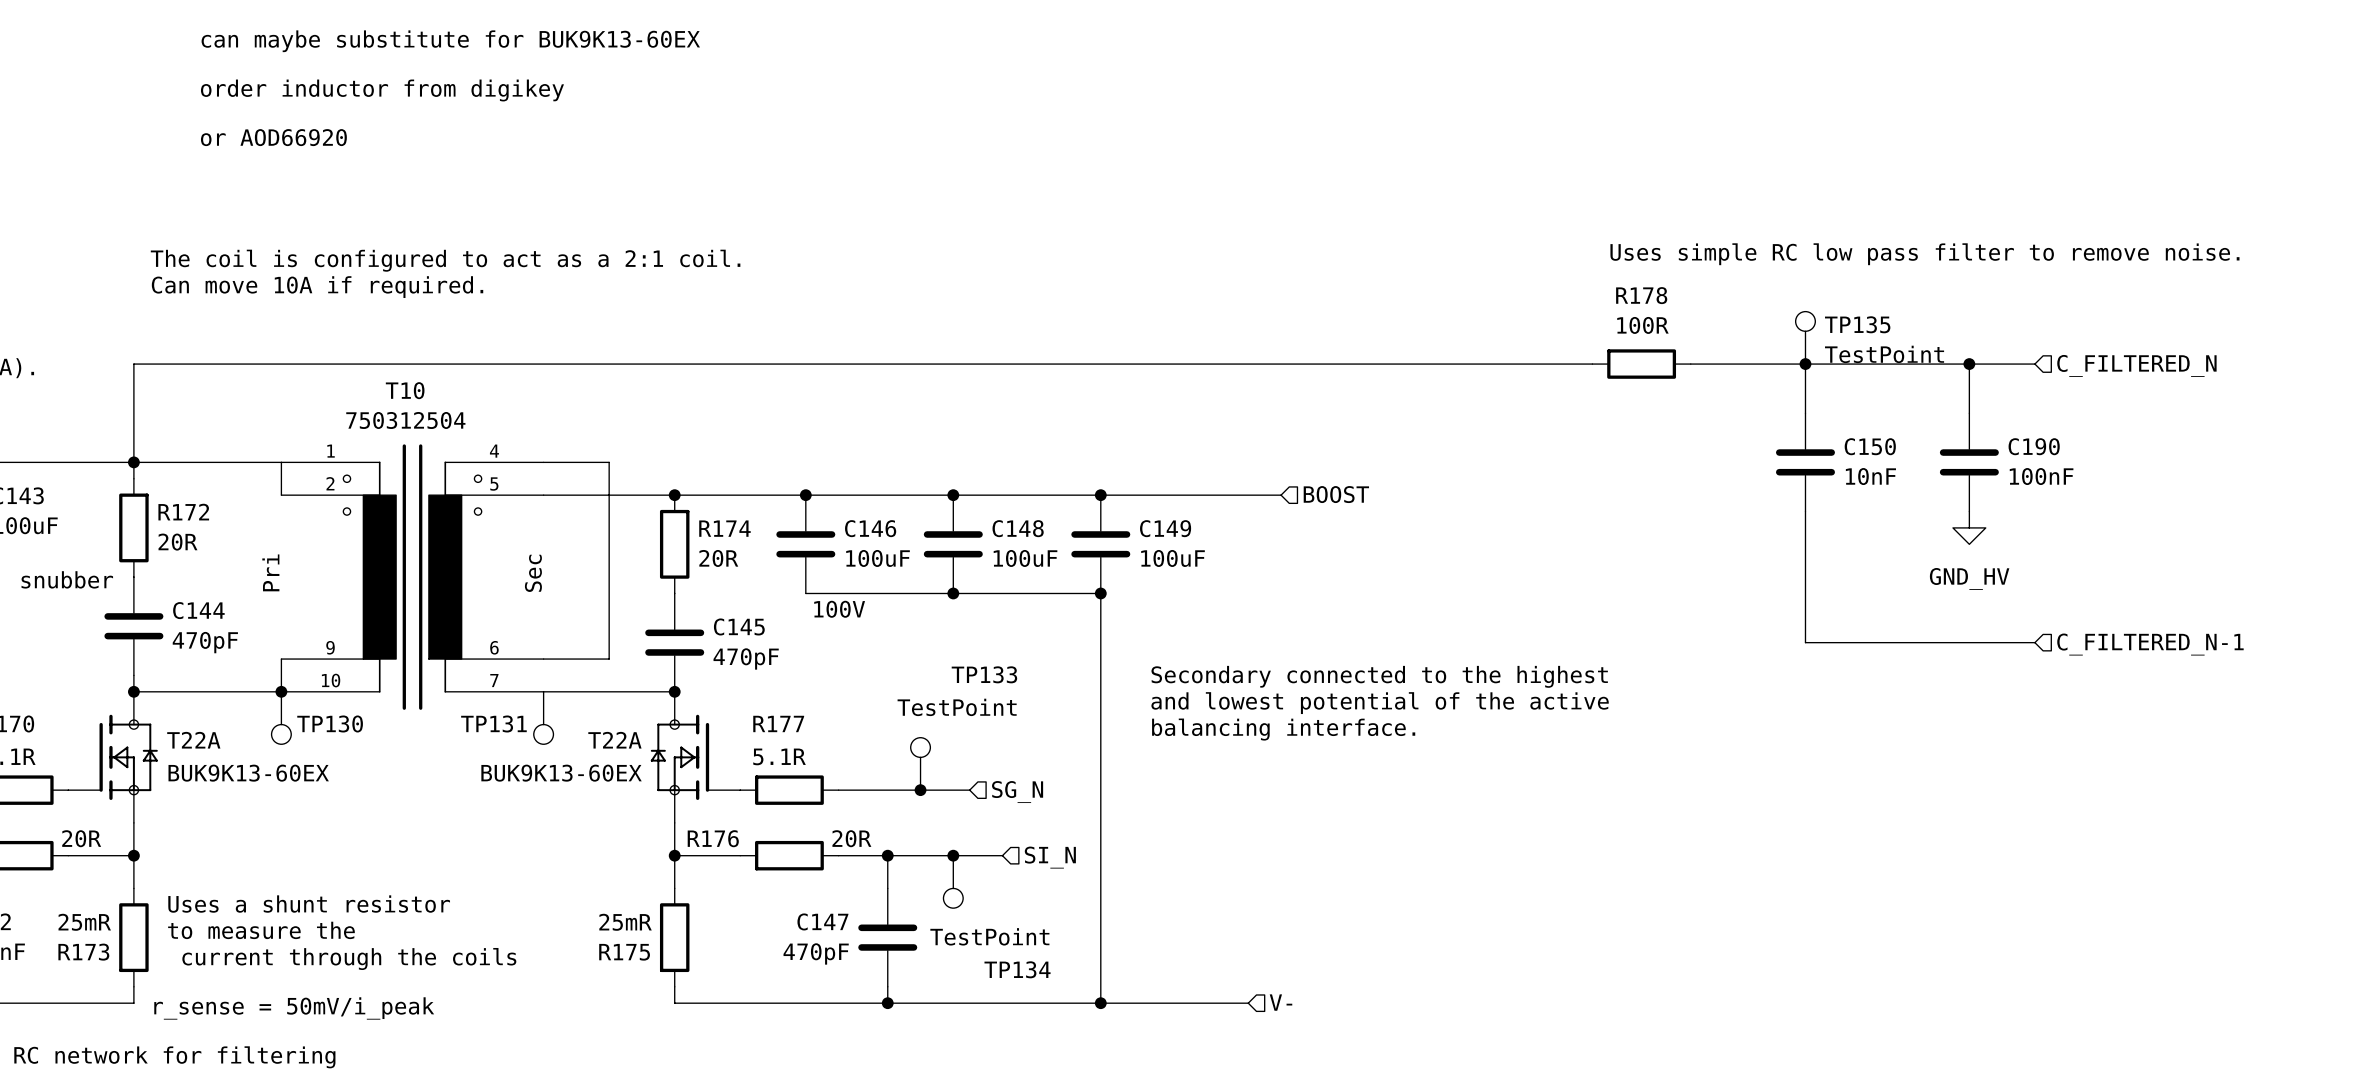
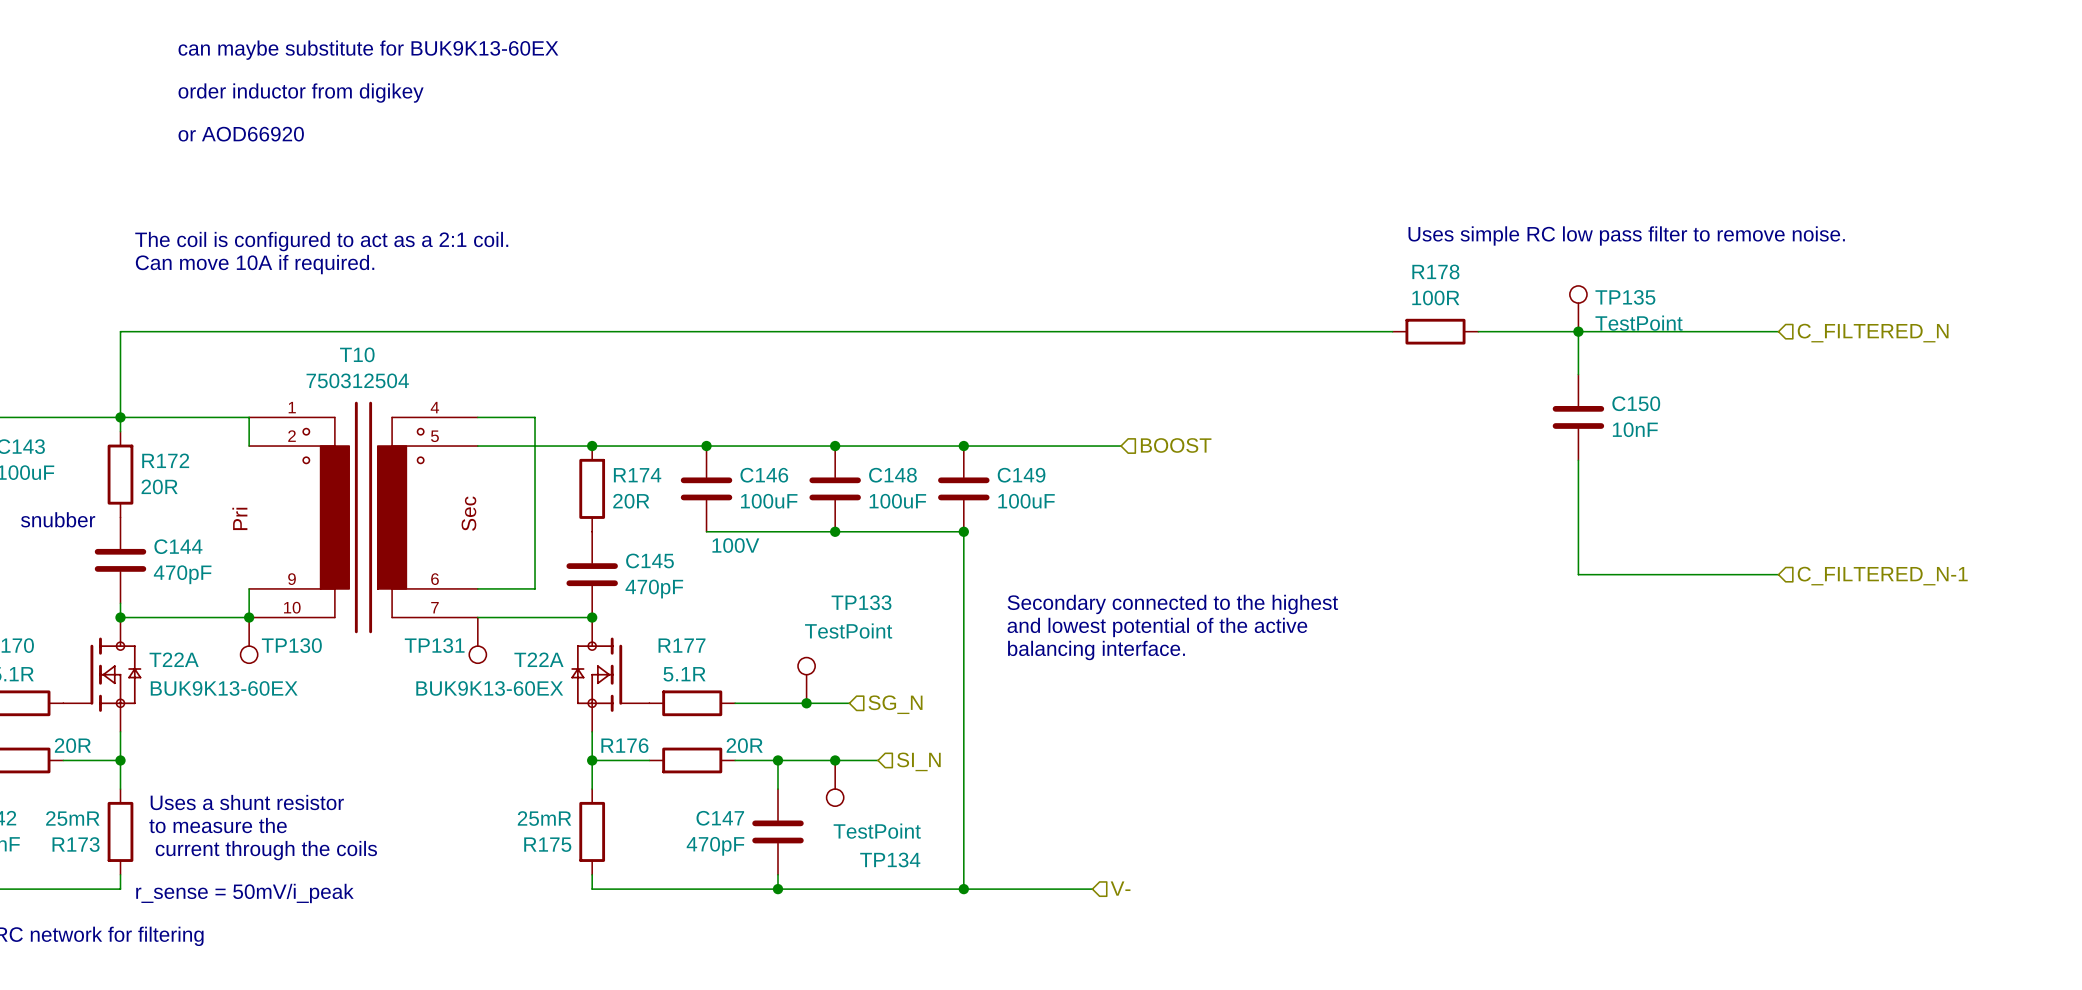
wire: (1969, 364) (1969, 413) -> none
junction: (1969, 364) -> none
C190: 100nF (1969, 462) -> none
power symbol: GND_HV (1969, 527) -> none

